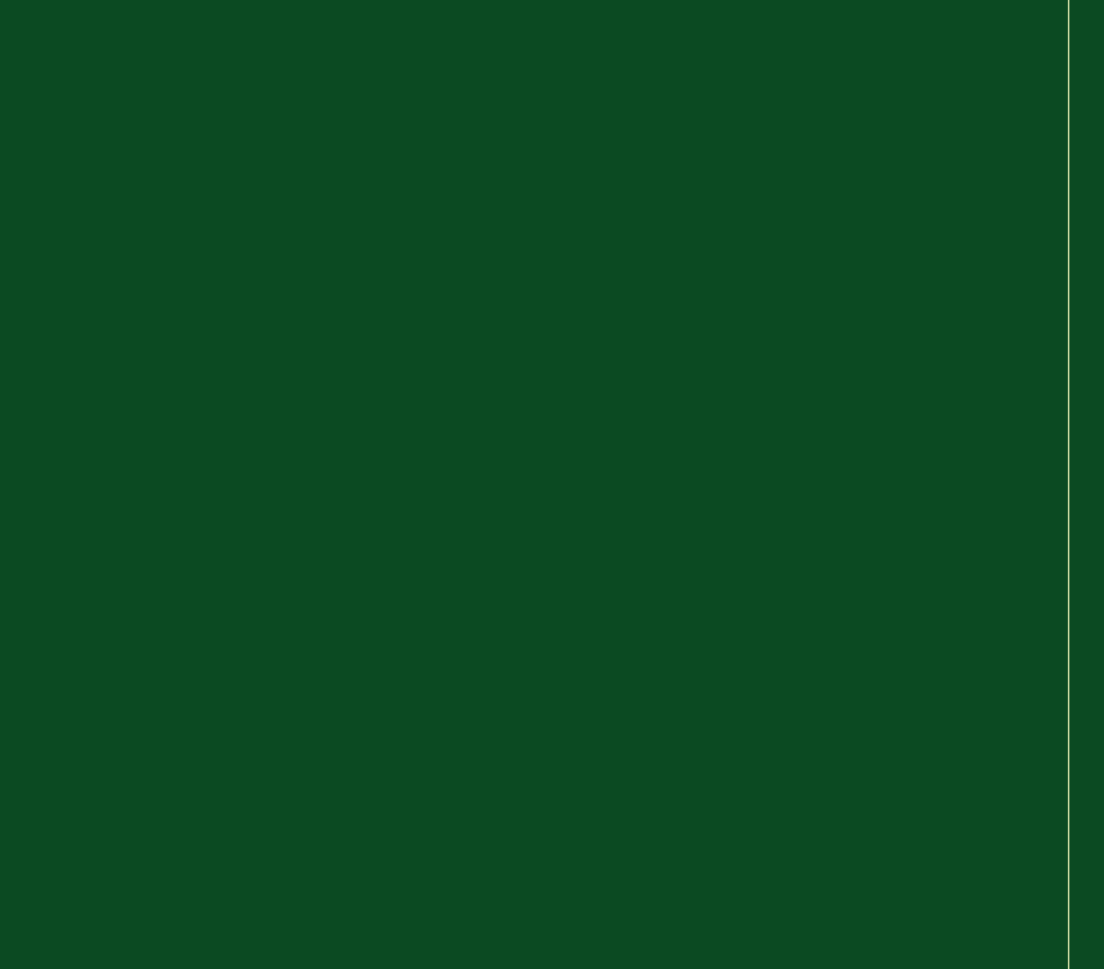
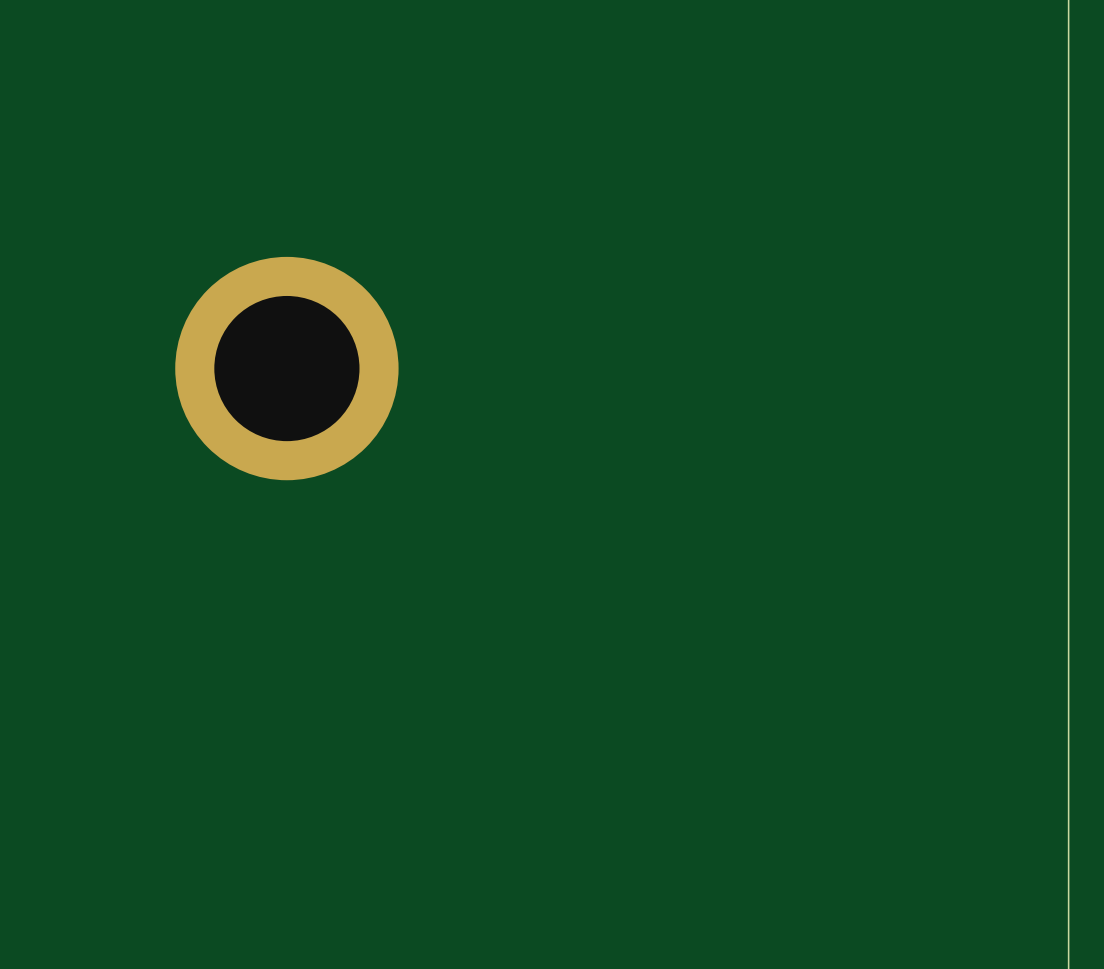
via: none -> (286, 368)

